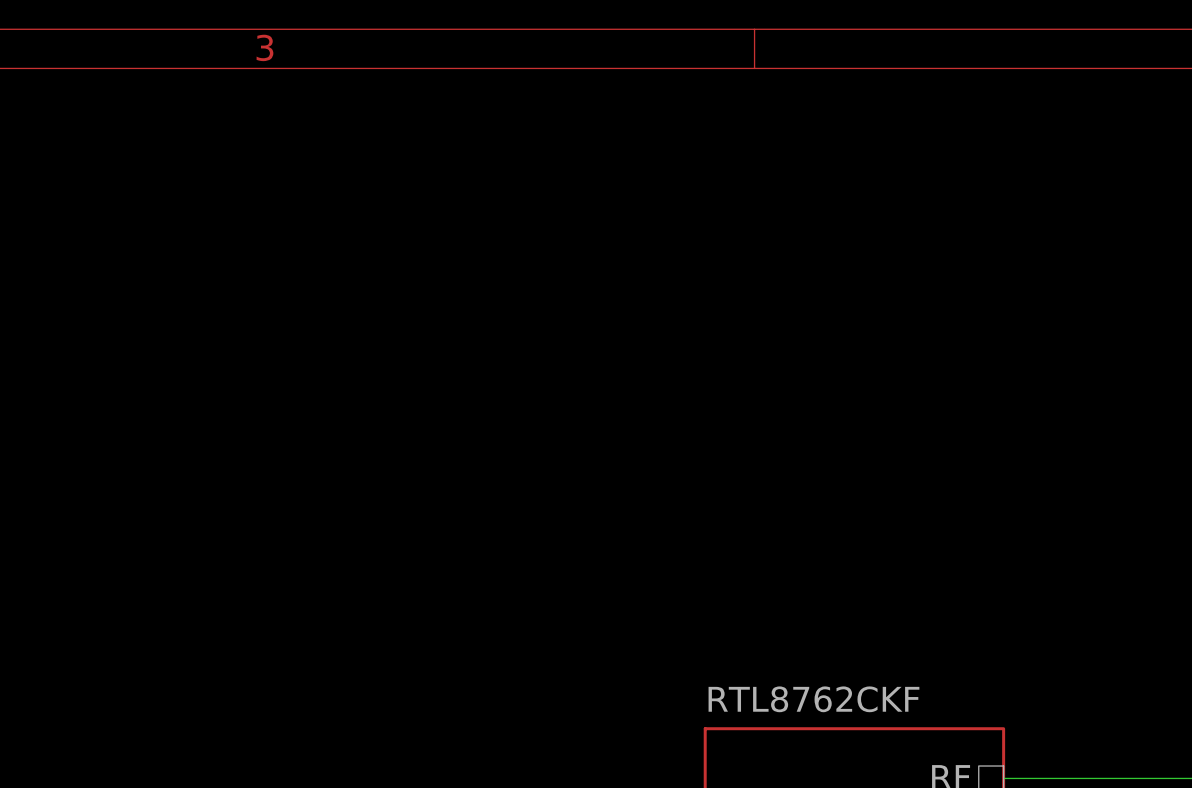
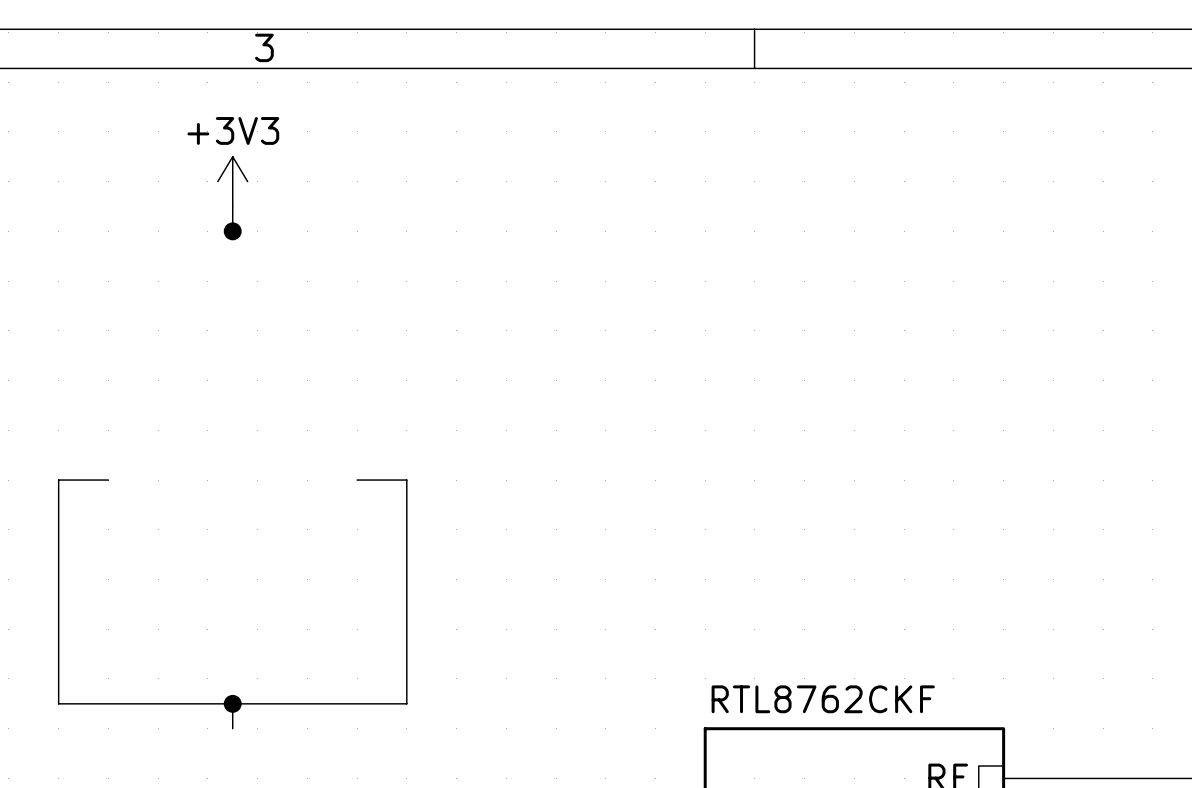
power symbol: none -> +3V3 (232, 181)
wire: none -> (232, 206) (232, 231)
junction: none -> (232, 231)
wire: none -> (108, 480) (58, 480) (58, 703) (406, 703) (406, 480) (357, 480)
wire: none -> (232, 703) (232, 728)
junction: none -> (232, 703)

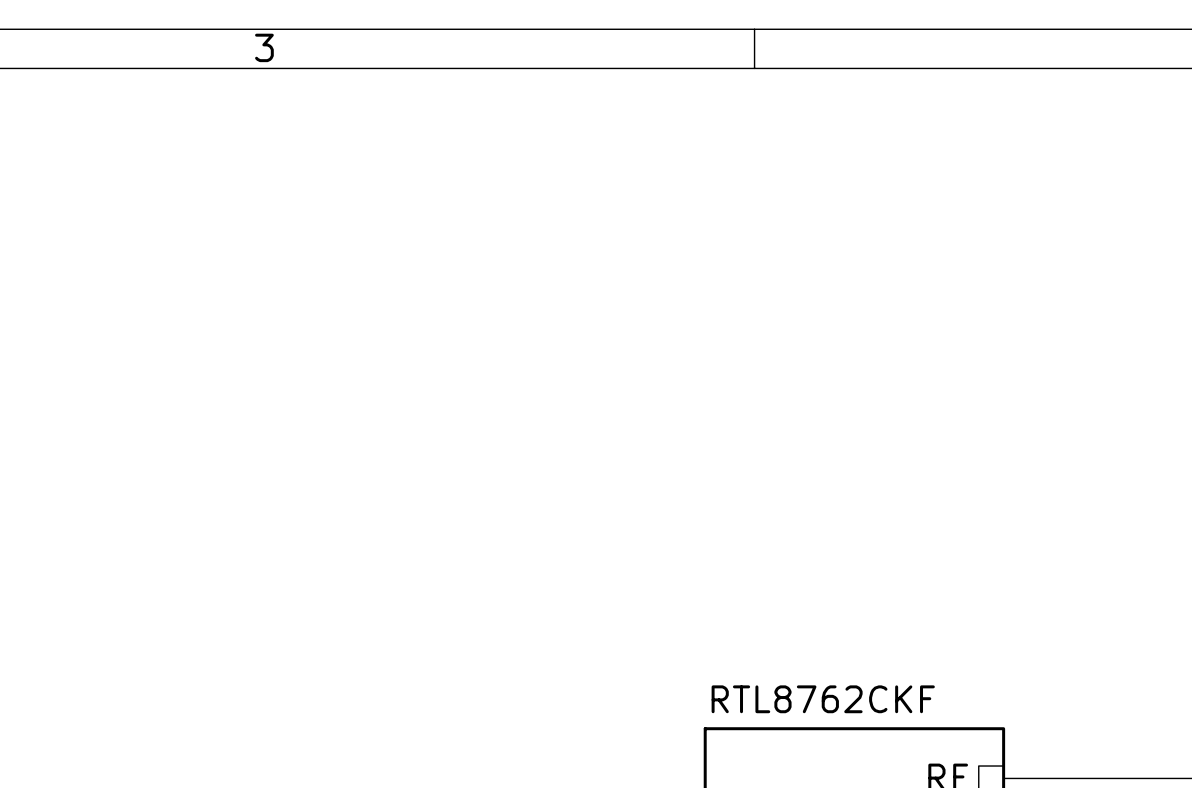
power symbol: +3V3 (232, 181) -> none
wire: (232, 206) (232, 231) -> none
junction: (232, 231) -> none
wire: (108, 480) (58, 480) (58, 703) (406, 703) (406, 480) (357, 480) -> none
wire: (232, 703) (232, 728) -> none
junction: (232, 703) -> none

